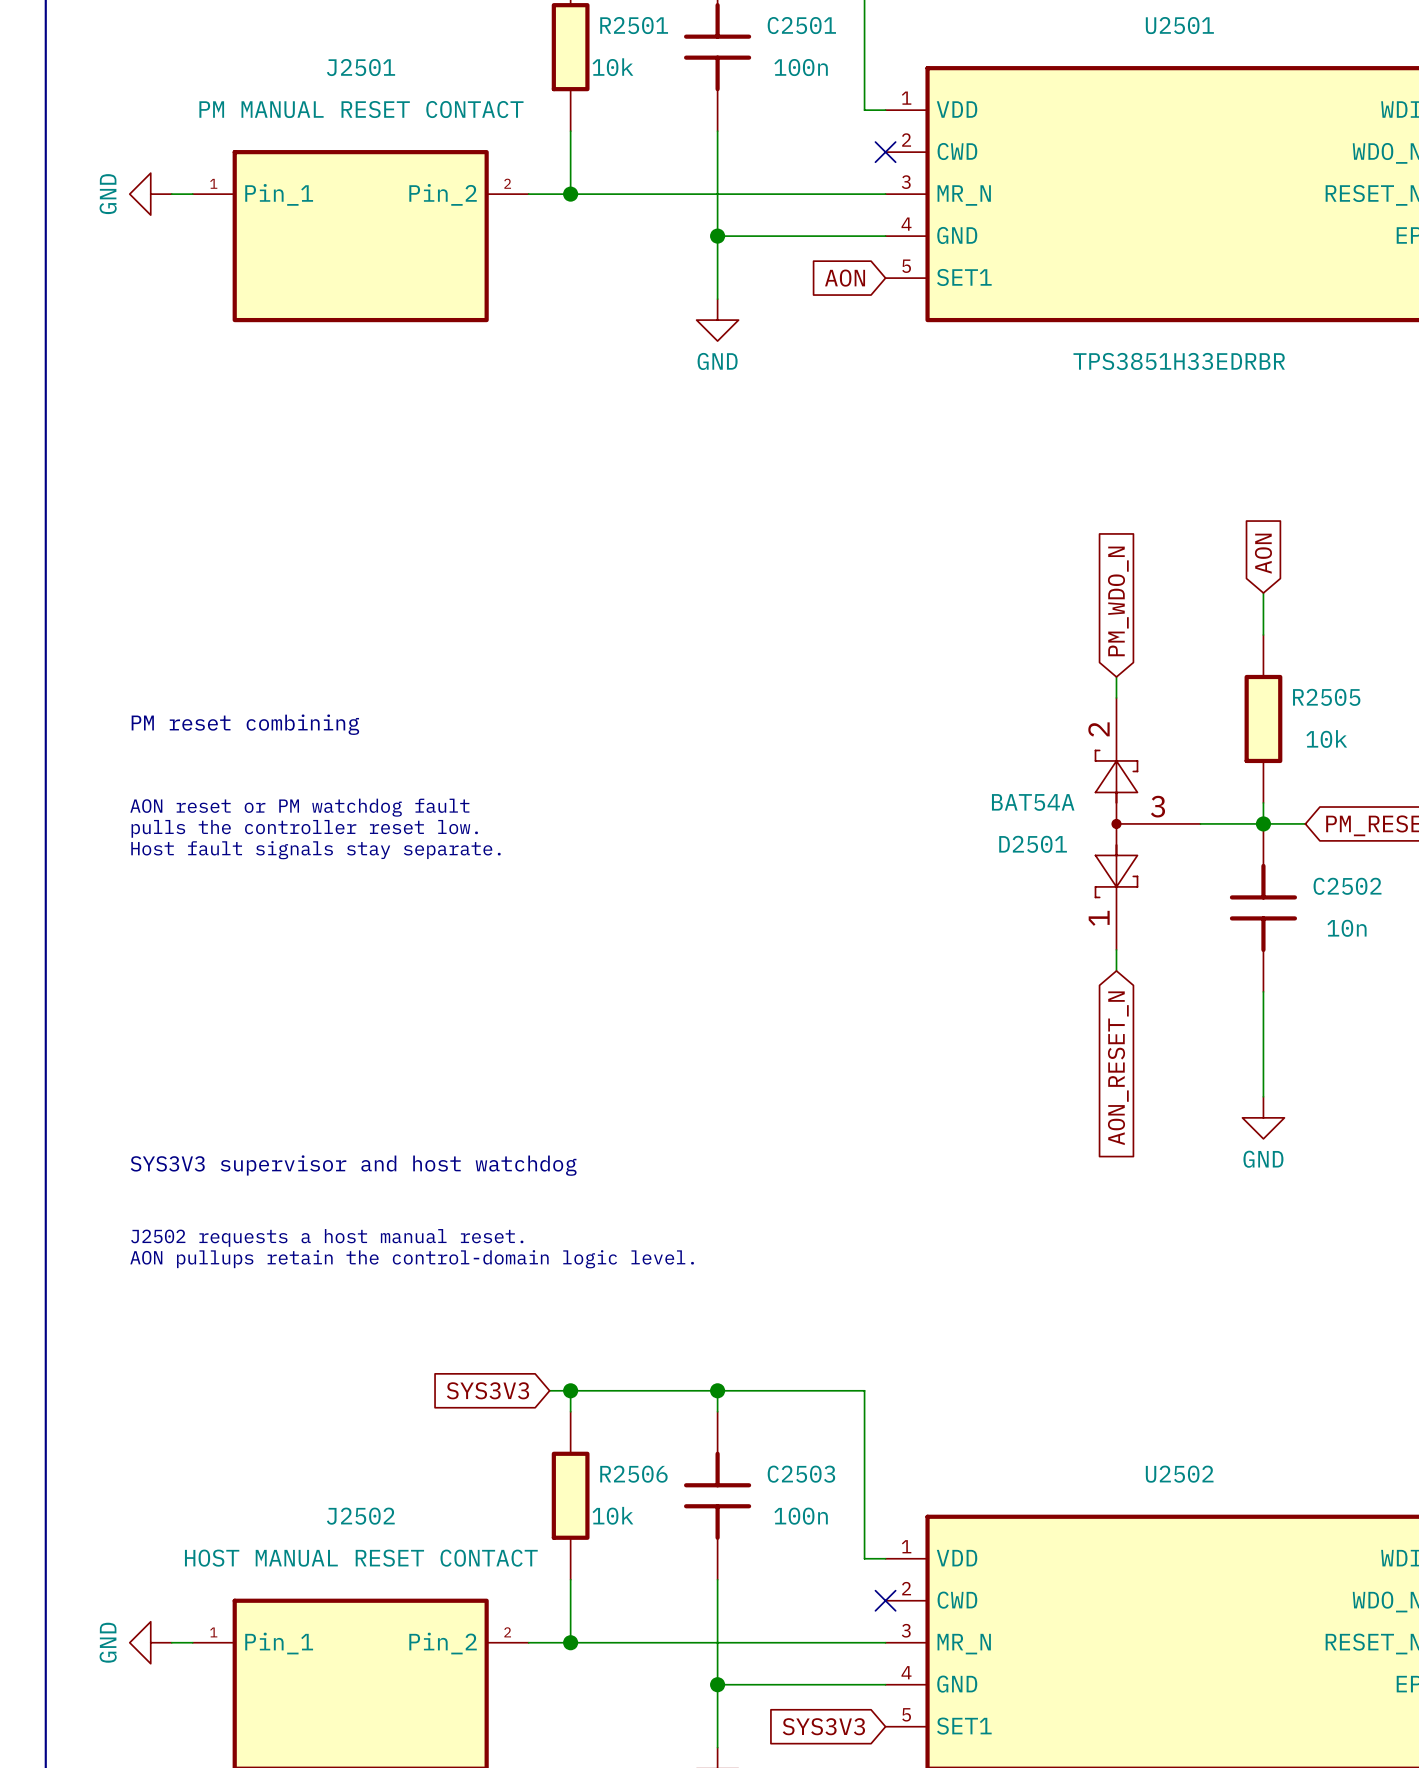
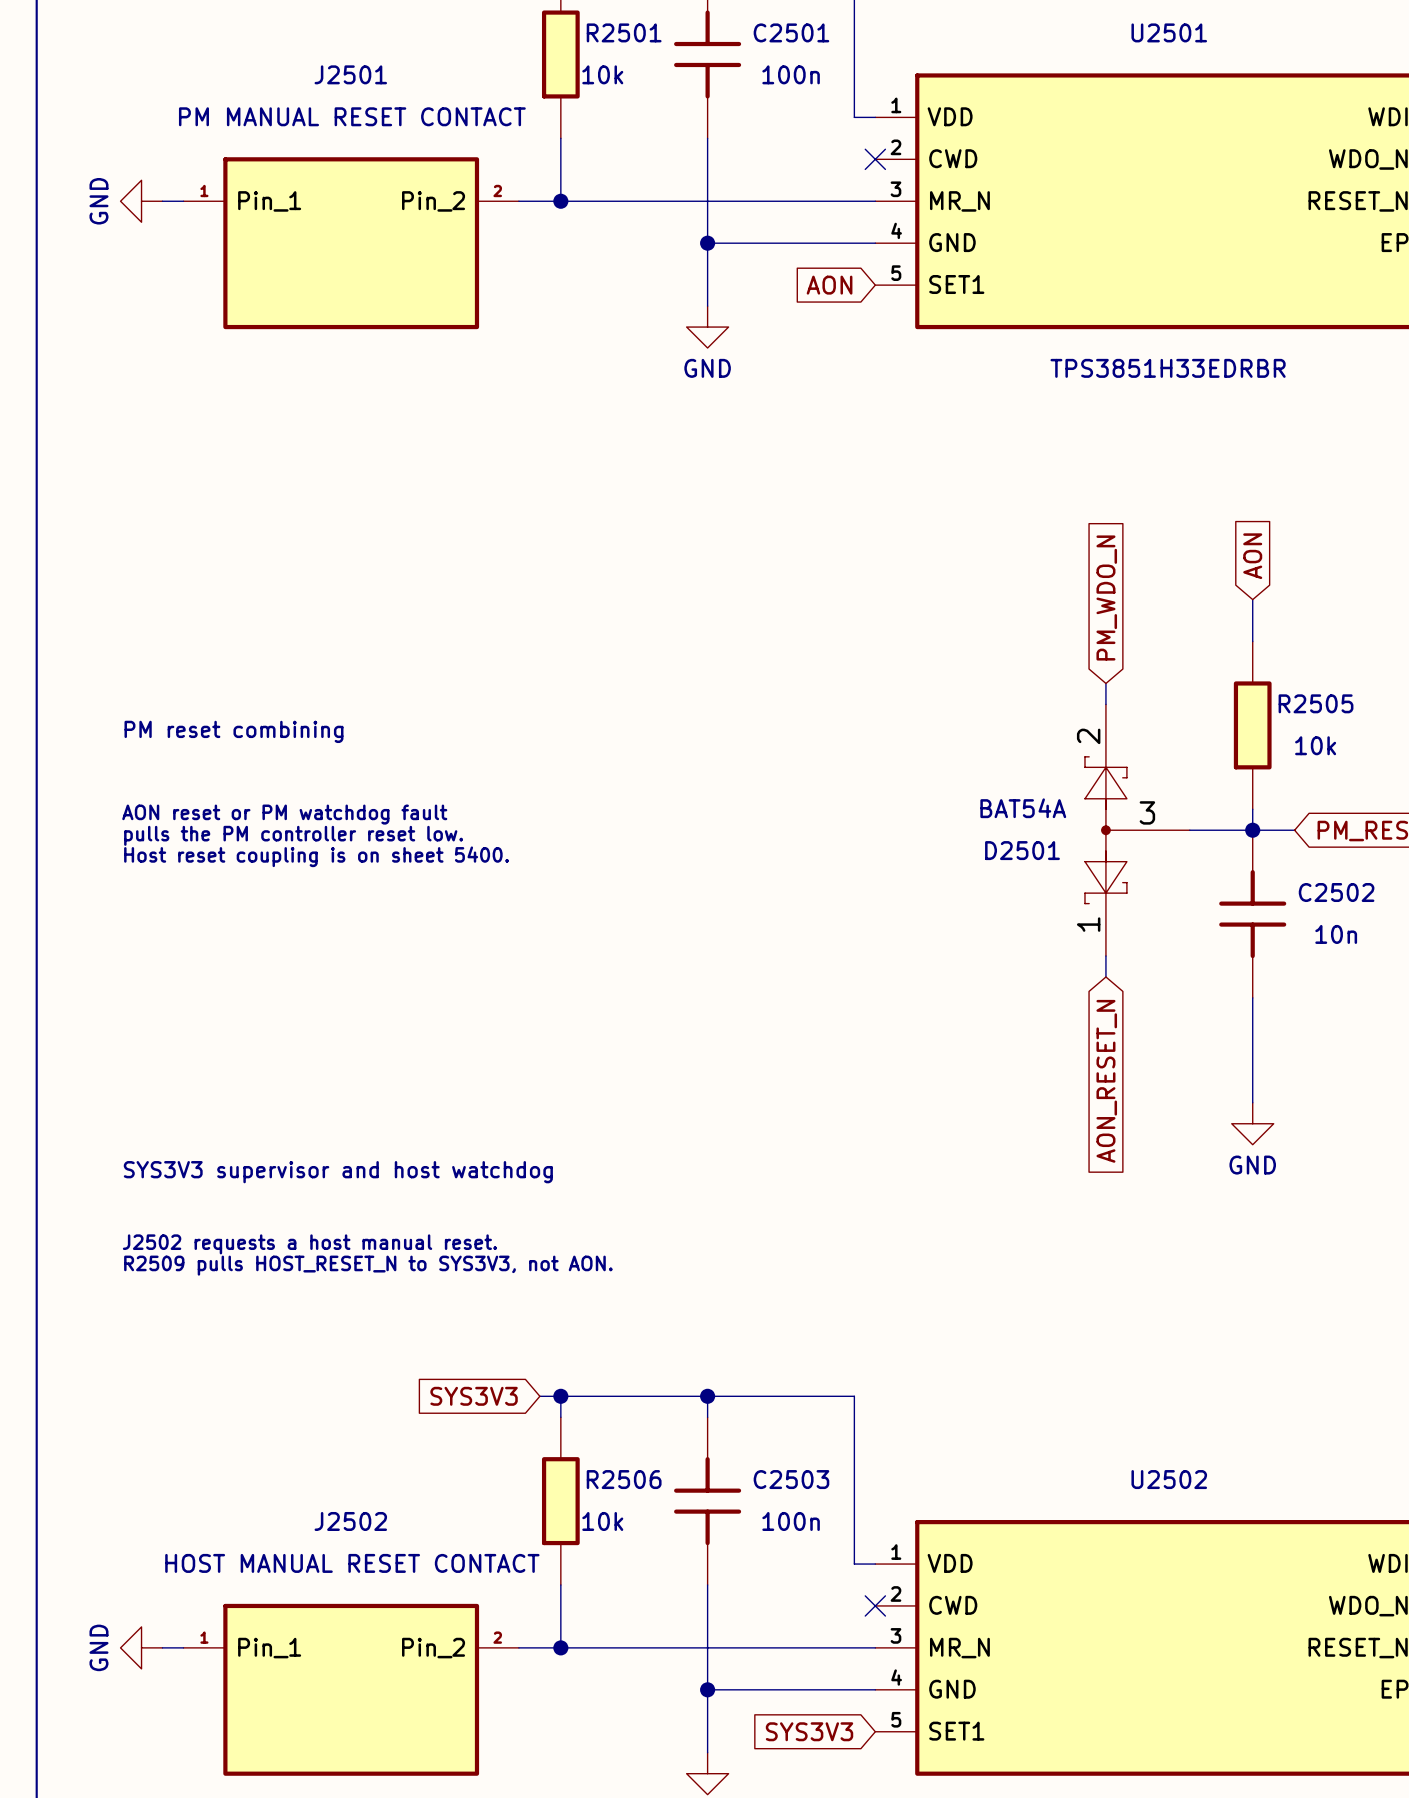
text: pulls the controller reset low. (304, 828) -> pulls the PM controller reset low. (293, 835)
text: Host fault signals stay separate. (315, 850) -> Host reset coupling is on sheet 5400. (316, 856)
text: AON pullups retain the control-domain logic level. (412, 1259) -> R2509 pulls HOST_RESET_N to SYS3V3, not AON. (368, 1265)

